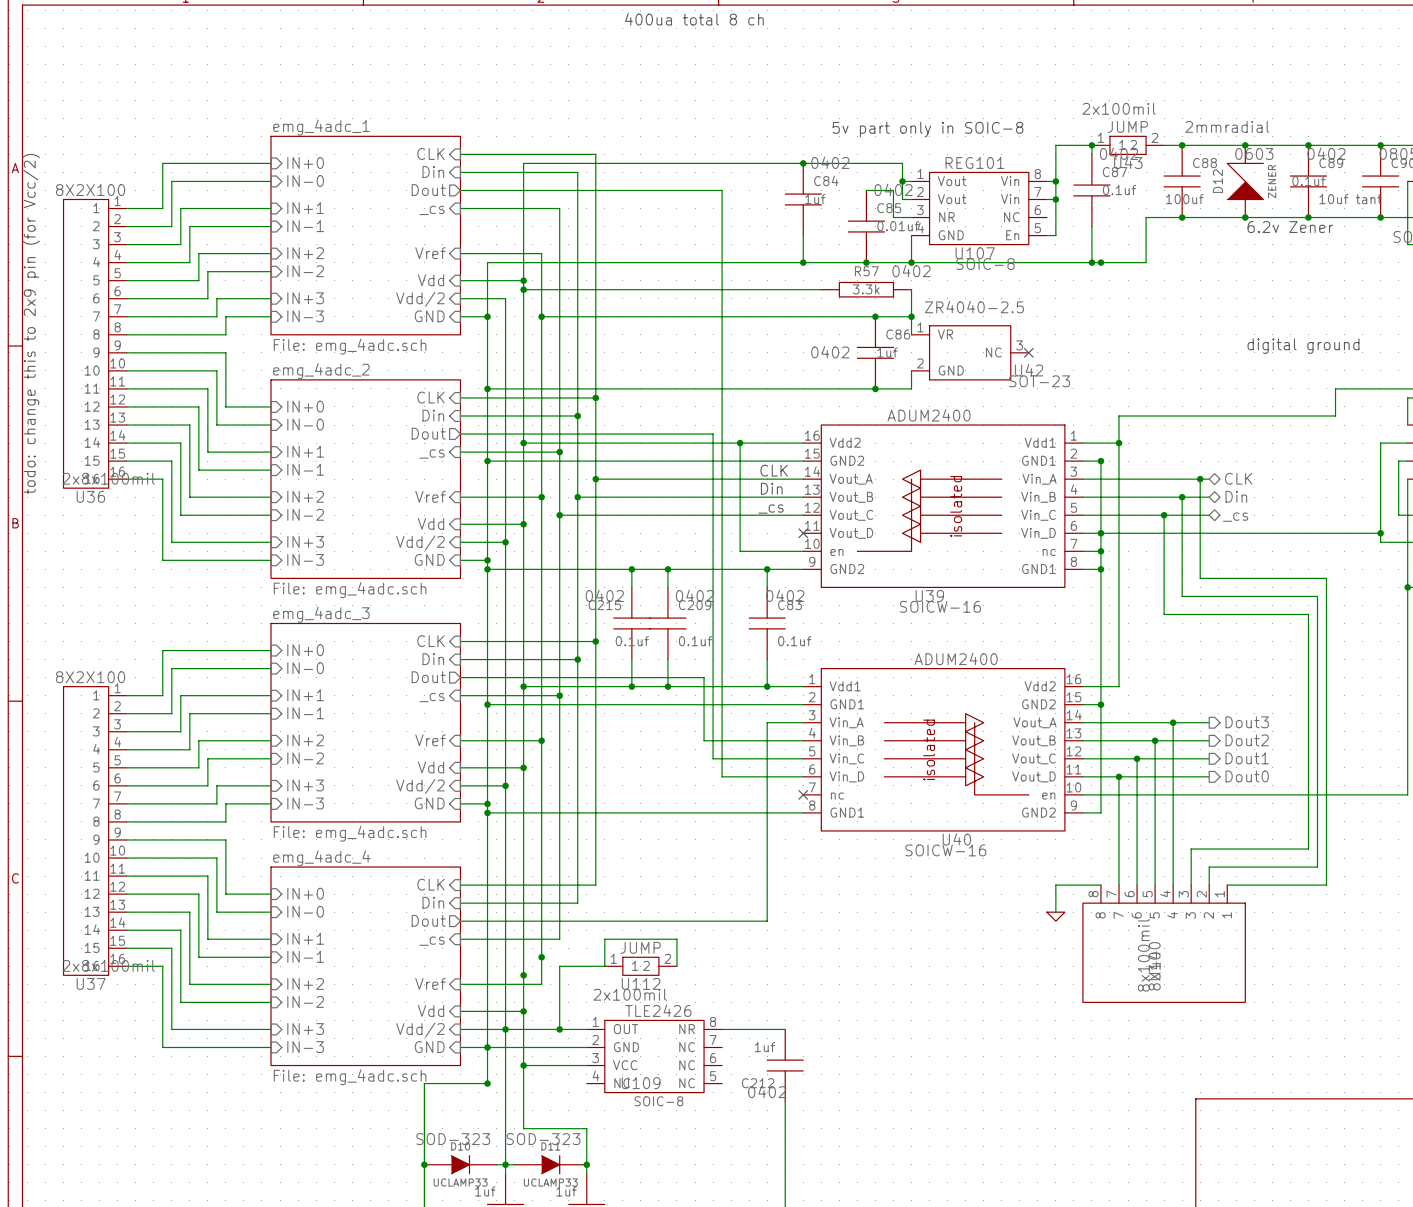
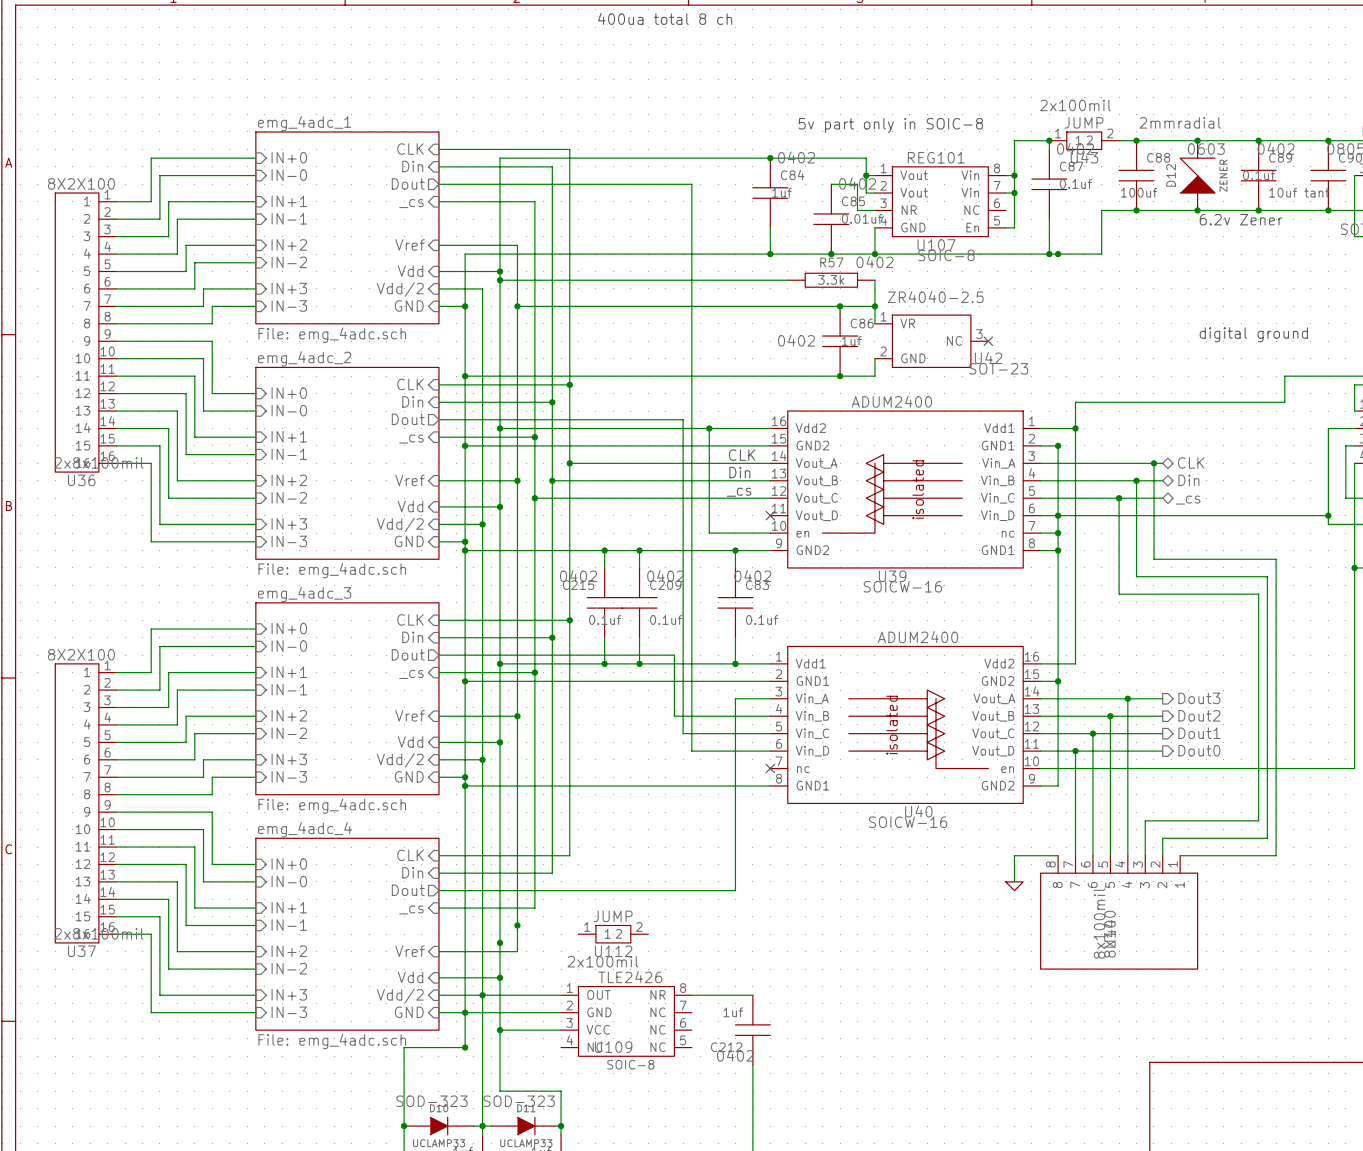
text: todo: change this to 2x9 pin (for Vcc/2) (31, 324) -> none
wire: (676, 966) (676, 939) (604, 939) (604, 966) (559, 966) (559, 1029) -> none
junction: (559, 1029) -> none

